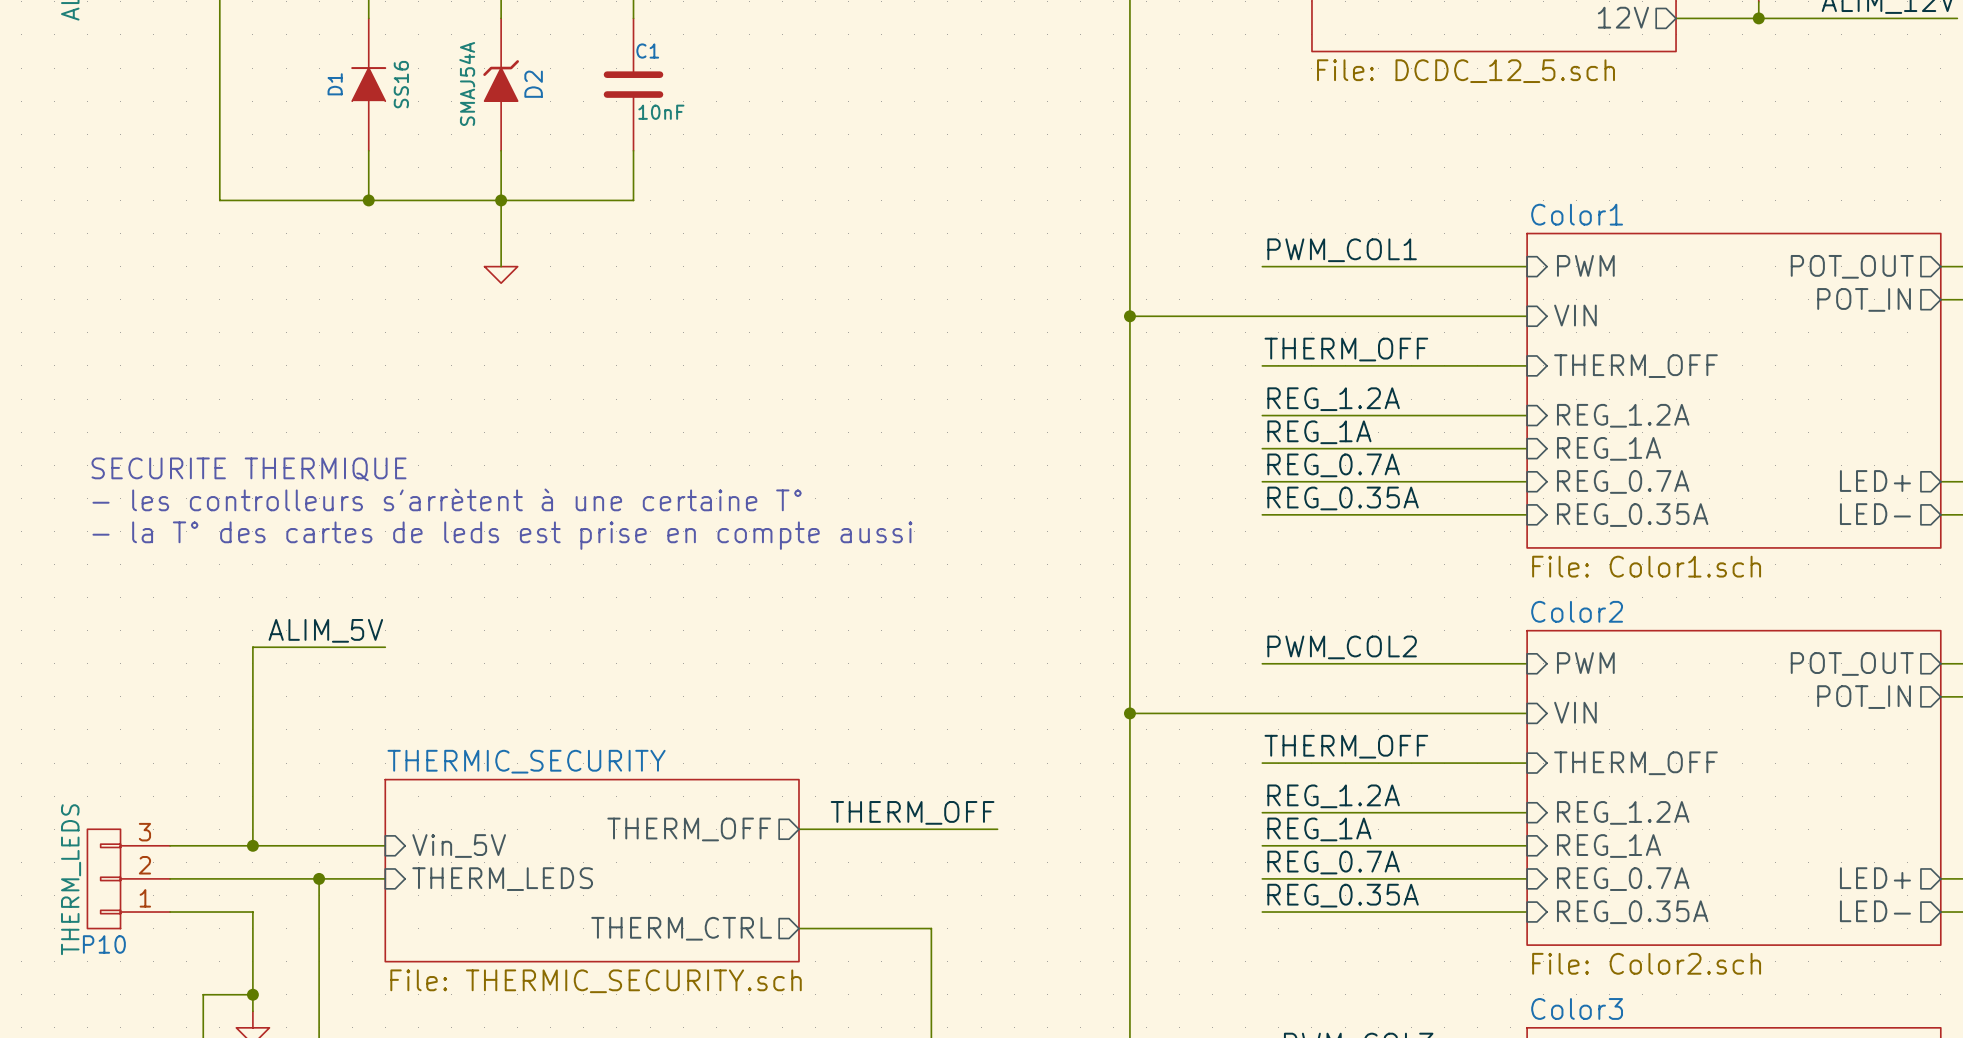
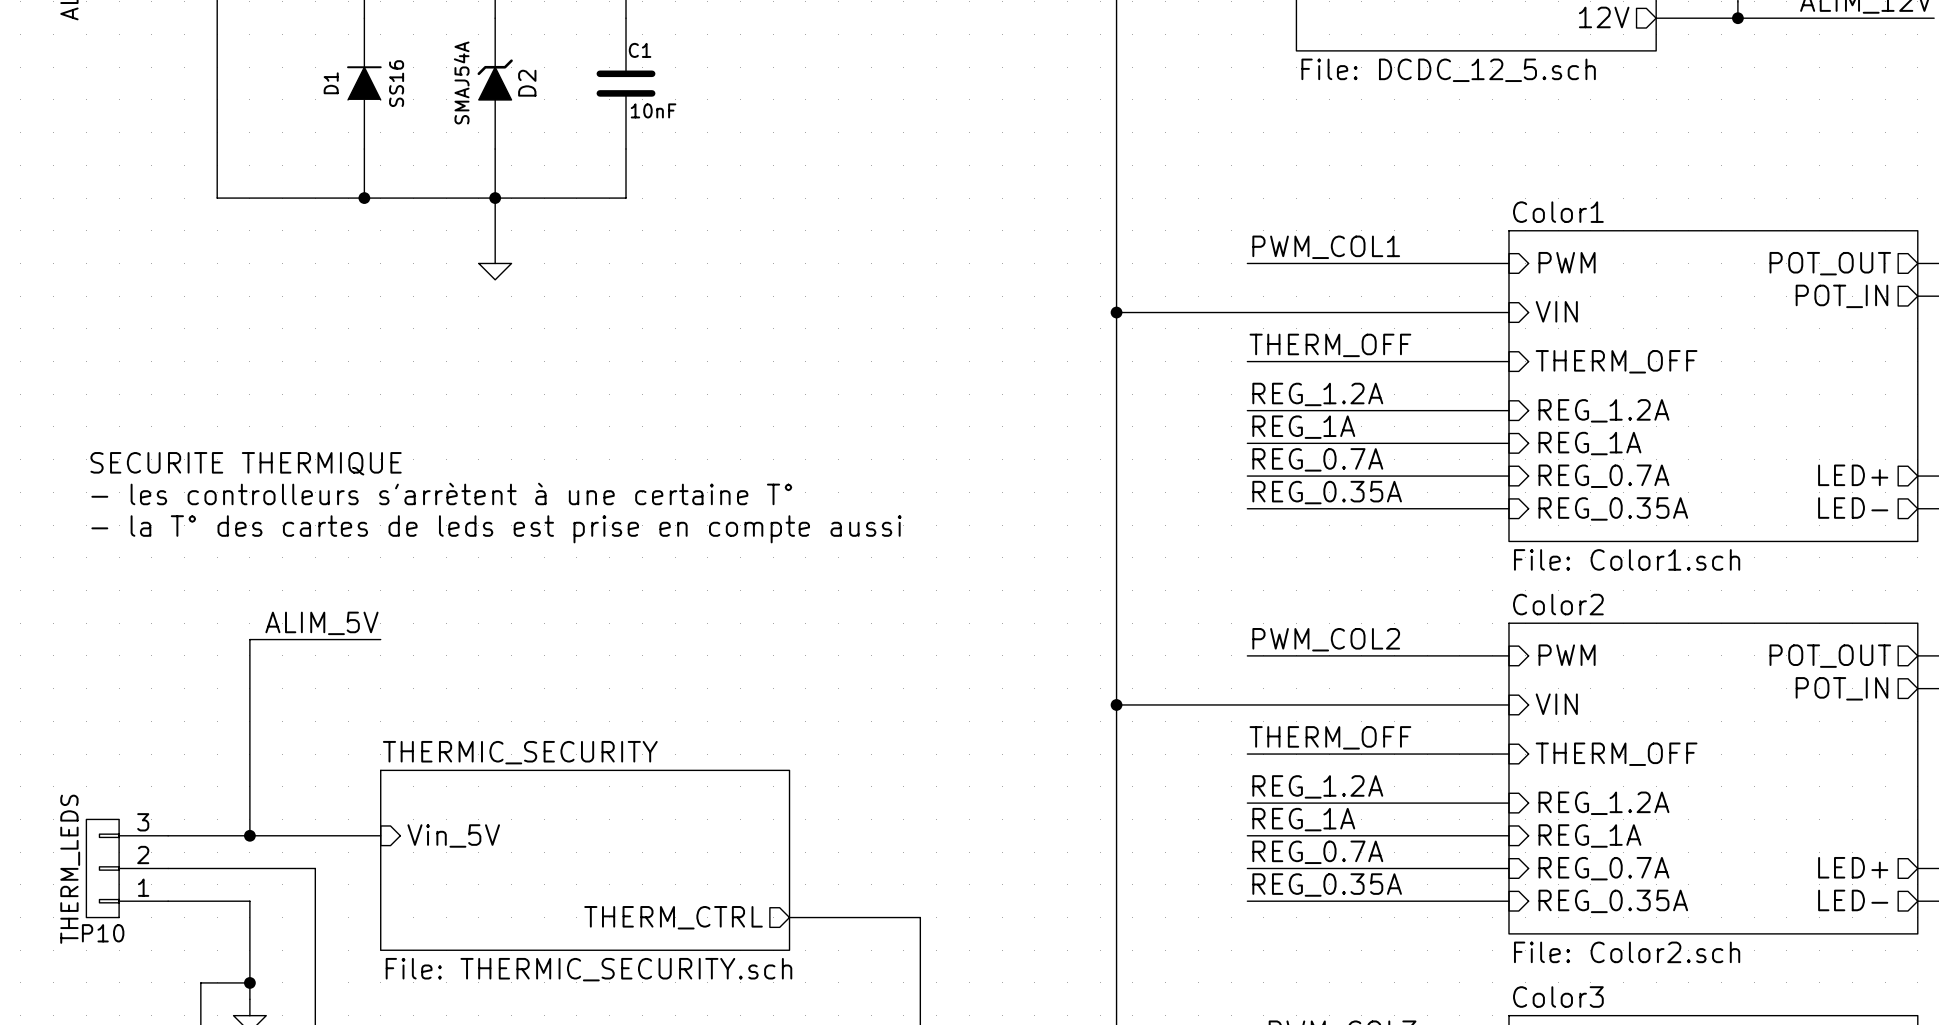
label: THERM_OFF (912, 812) -> none
sheet pin: THERM_OFF (689, 829) -> none
wire: (798, 829) (997, 829) -> none
wire: (319, 878) (385, 878) -> none
junction: (319, 878) -> none
sheet pin: THERM_LEDS (502, 879) -> none

